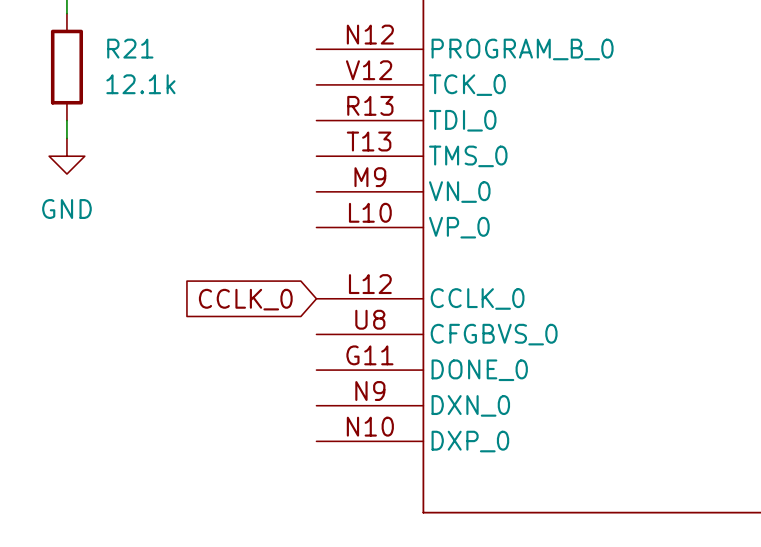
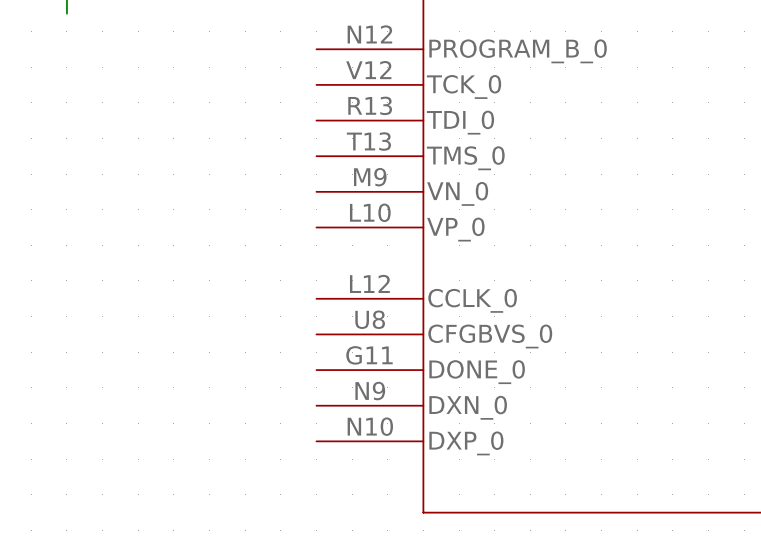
R21: 12.1k (66, 67) -> none
wire: (66, 120) (66, 138) -> none
power symbol: GND (66, 156) -> none
global label: CCLK_0 (245, 299) -> none

